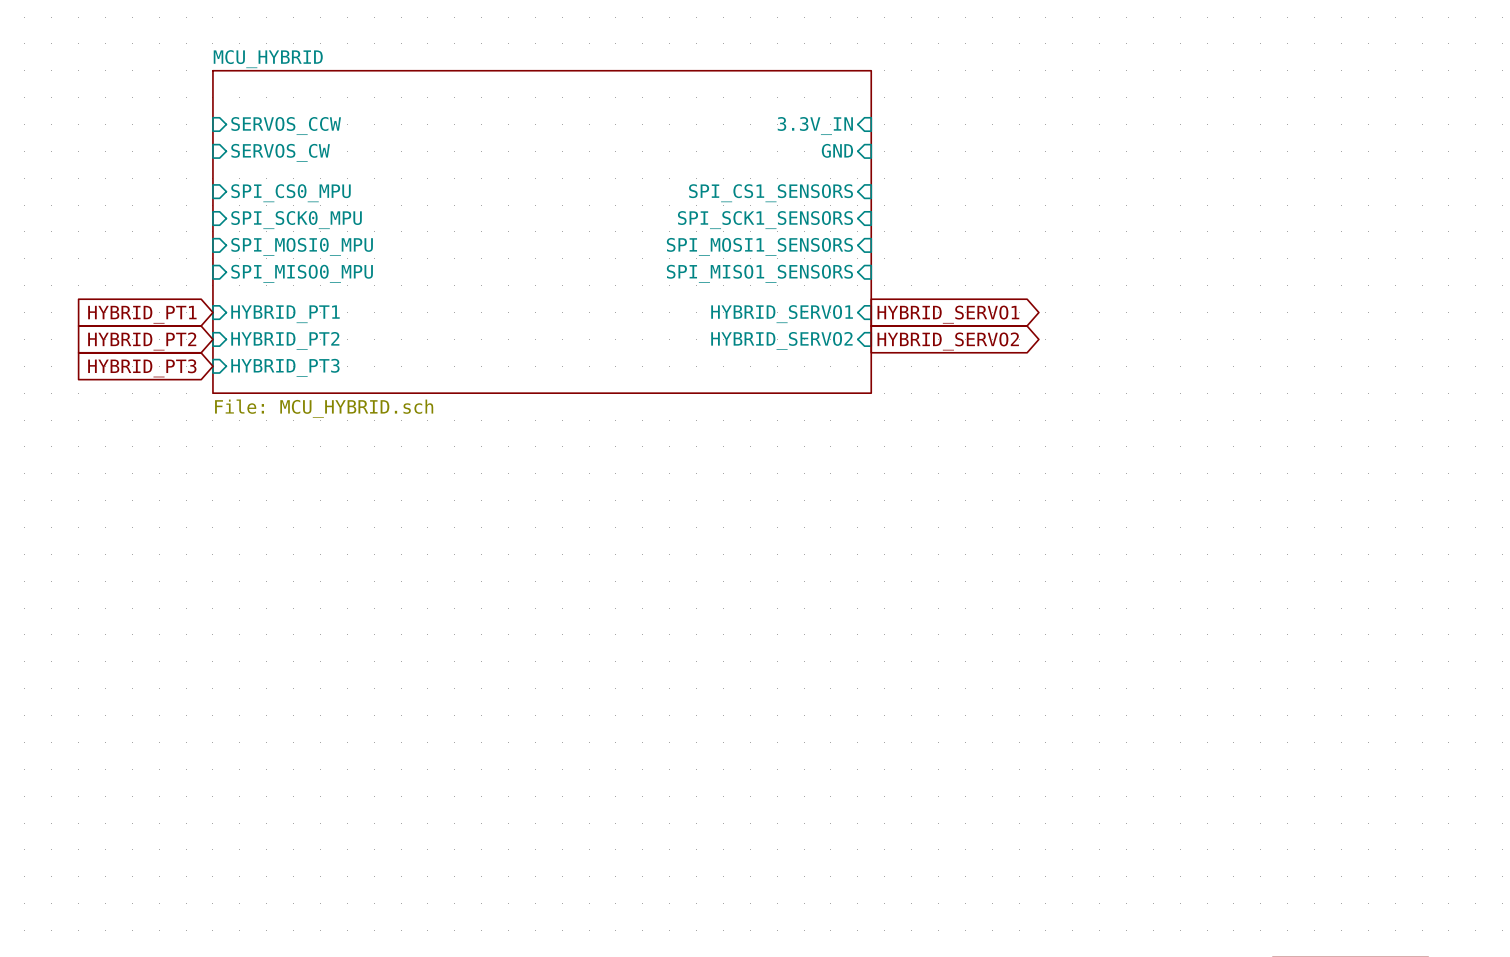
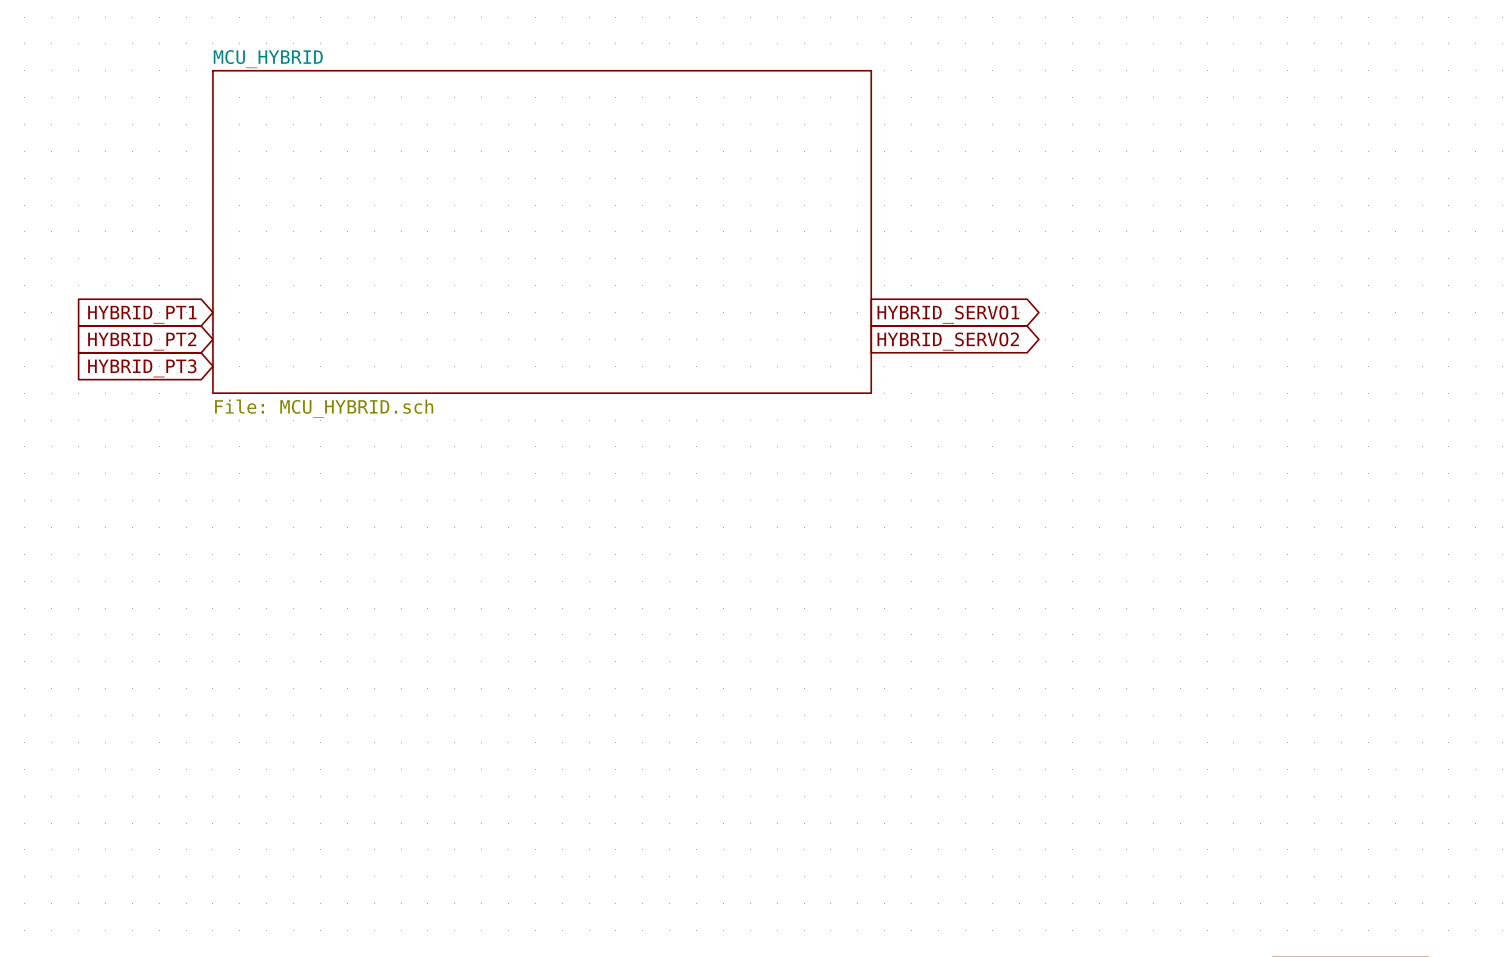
sheet pin: SERVOS_CCW (286, 126) -> none
sheet pin: 3.3V_IN (815, 126) -> none
sheet pin: GND (837, 150) -> none
sheet pin: SERVOS_CW (280, 152) -> none
sheet pin: SPI_CS0_MPU (291, 193) -> none
sheet pin: SPI_CS1_SENSORS (771, 193) -> none
sheet pin: SPI_SCK0_MPU (296, 220) -> none
sheet pin: SPI_SCK1_SENSORS (765, 220) -> none
sheet pin: SPI_MOSI0_MPU (302, 246) -> none
sheet pin: SPI_MOSI1_SENSORS (759, 246) -> none
sheet pin: SPI_MISO0_MPU (302, 273) -> none
sheet pin: SPI_MISO1_SENSORS (759, 273) -> none
sheet pin: HYBRID_PT1 (285, 314) -> none
sheet pin: HYBRID_SERVO1 (782, 314) -> none
sheet pin: HYBRID_PT2 (285, 340) -> none
sheet pin: HYBRID_SERVO2 (781, 340) -> none
sheet pin: HYBRID_PT3 (285, 367) -> none

